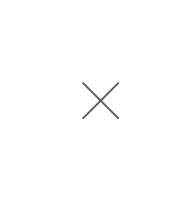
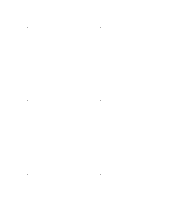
no-connect mark: (100, 100) -> none

